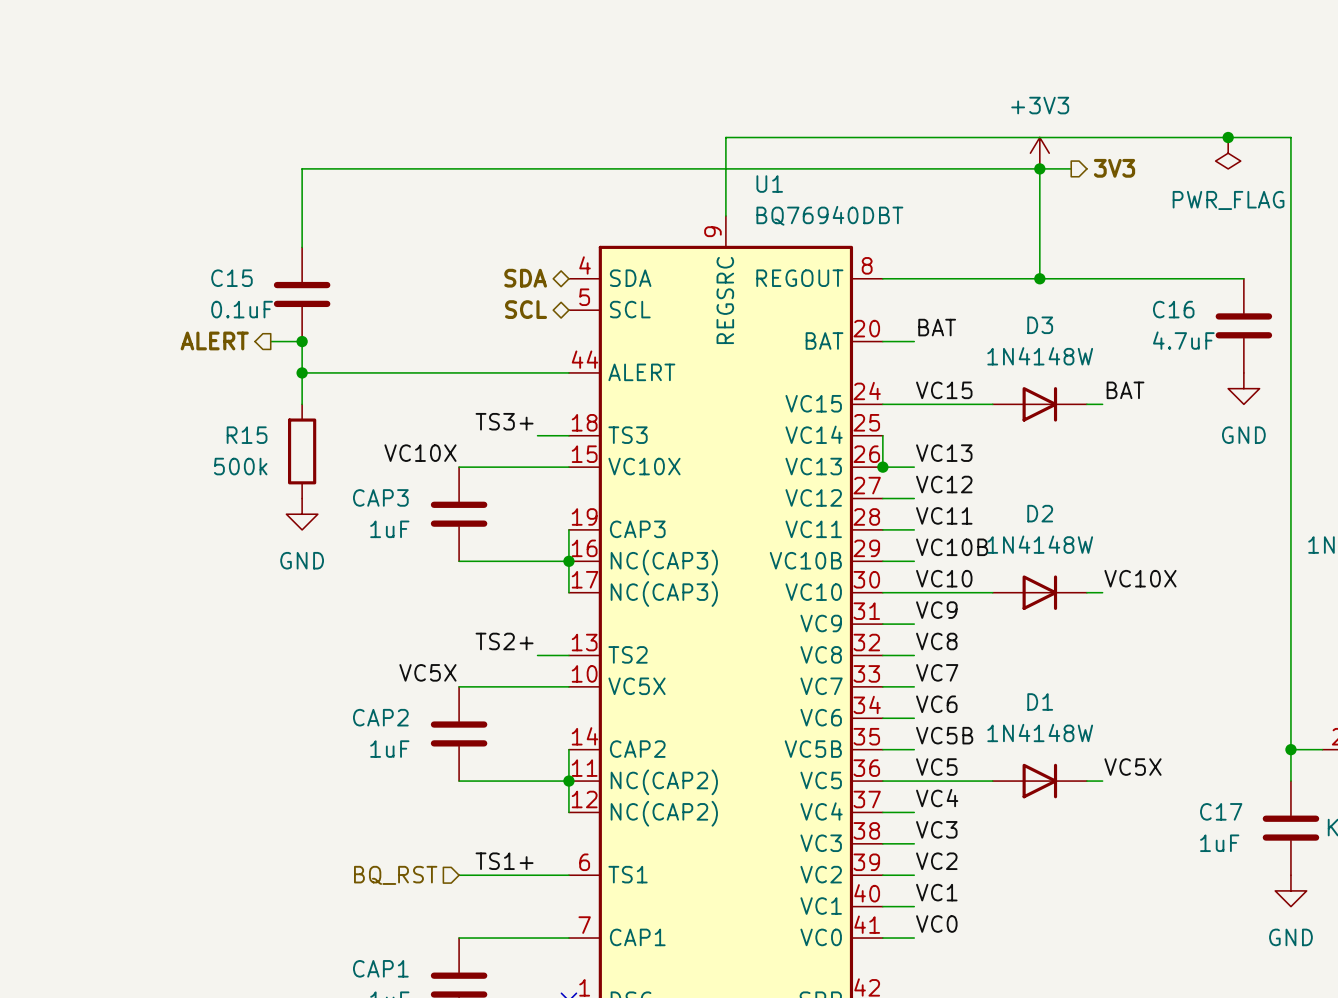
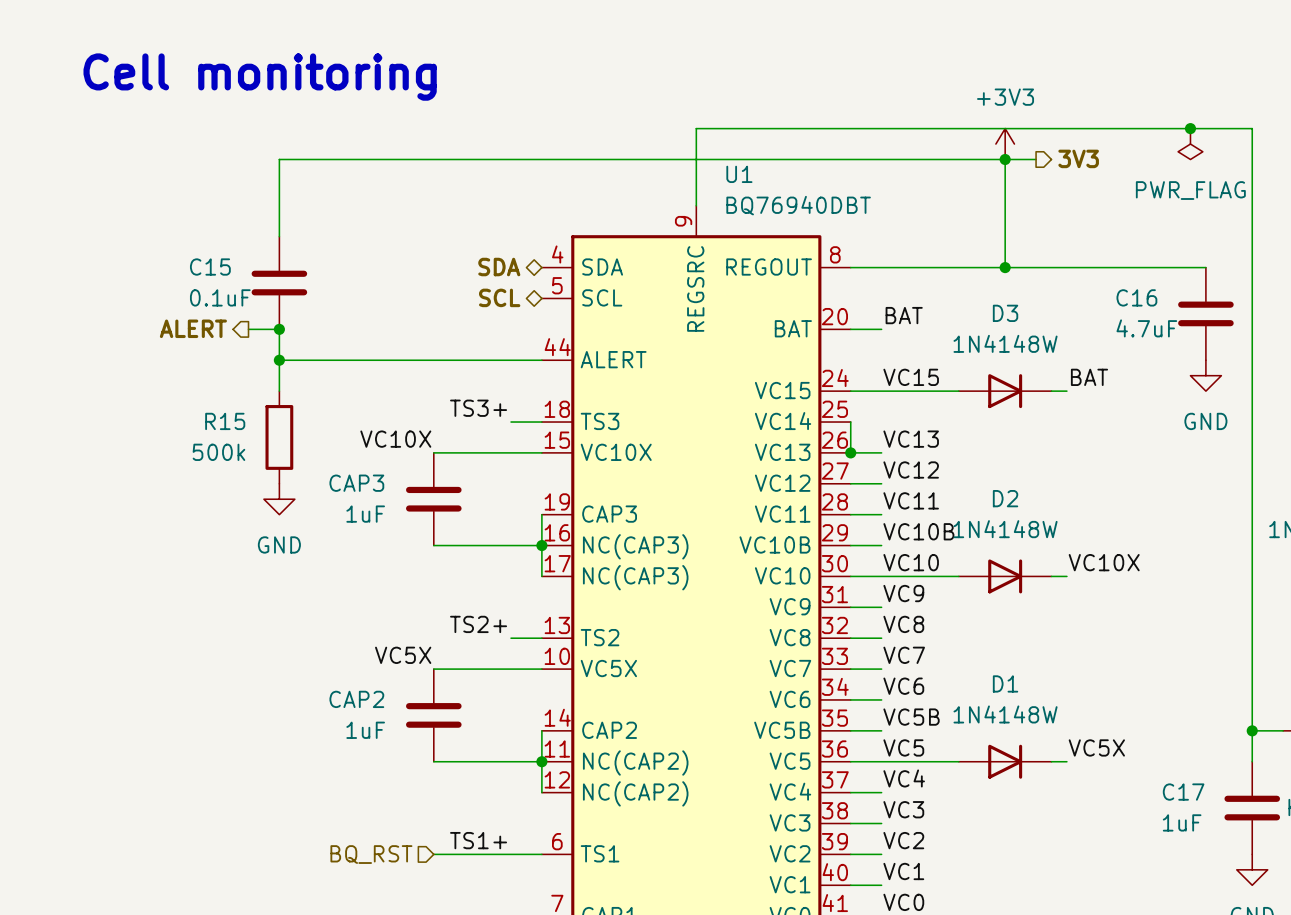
text: none -> Cell monitoring (260, 77)

